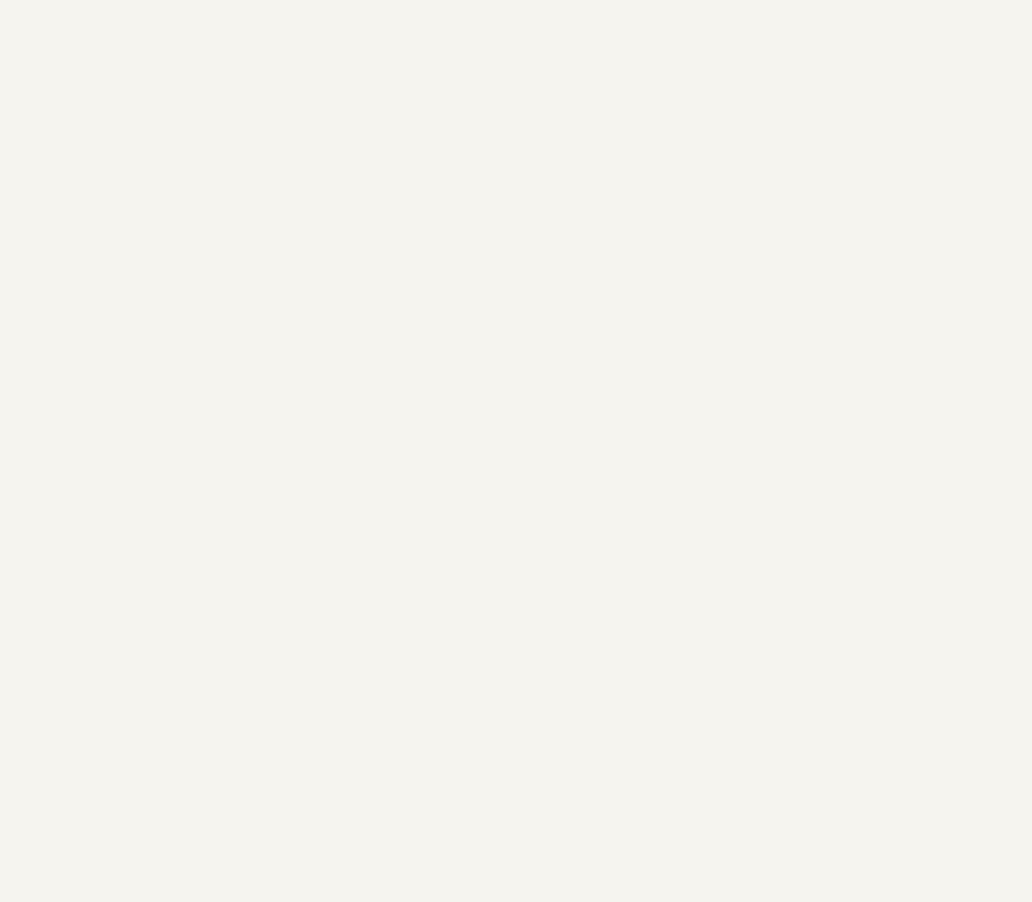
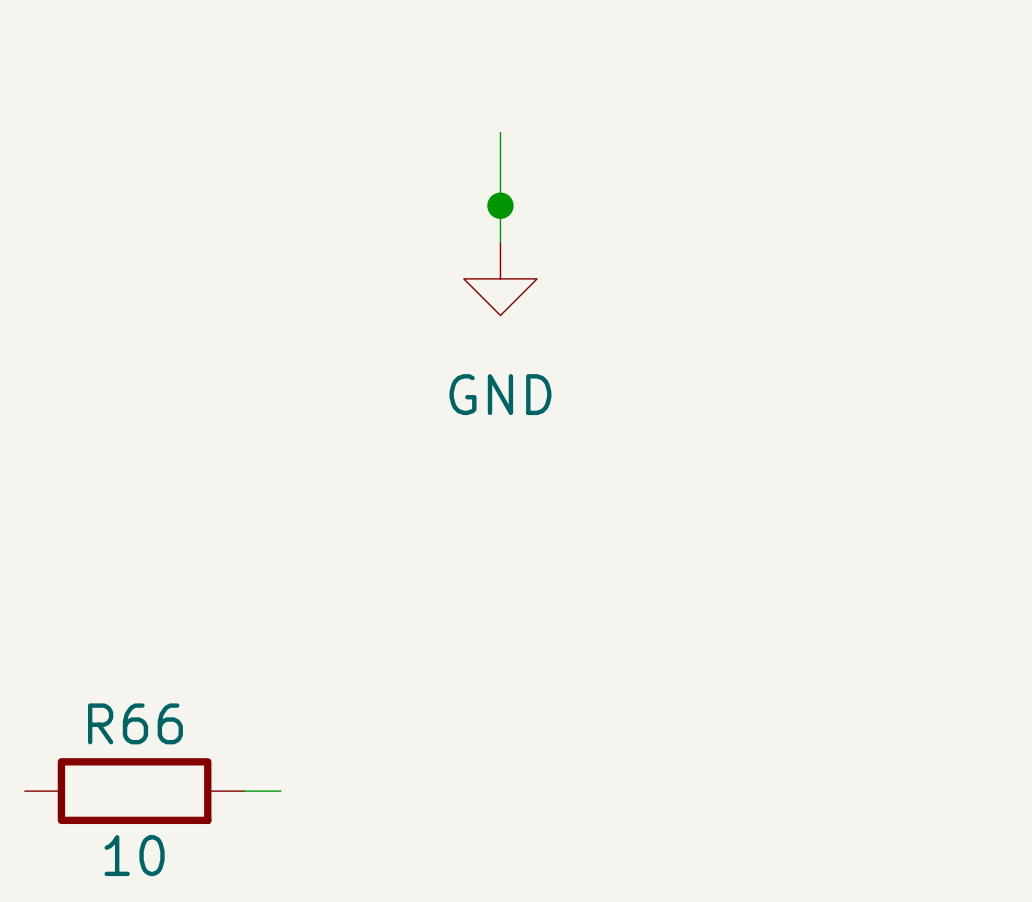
wire: none -> (500, 132) (500, 242)
junction: none -> (500, 205)
power symbol: none -> GND (500, 278)
R66: none -> 10 (134, 791)
wire: none -> (244, 791) (280, 791)

